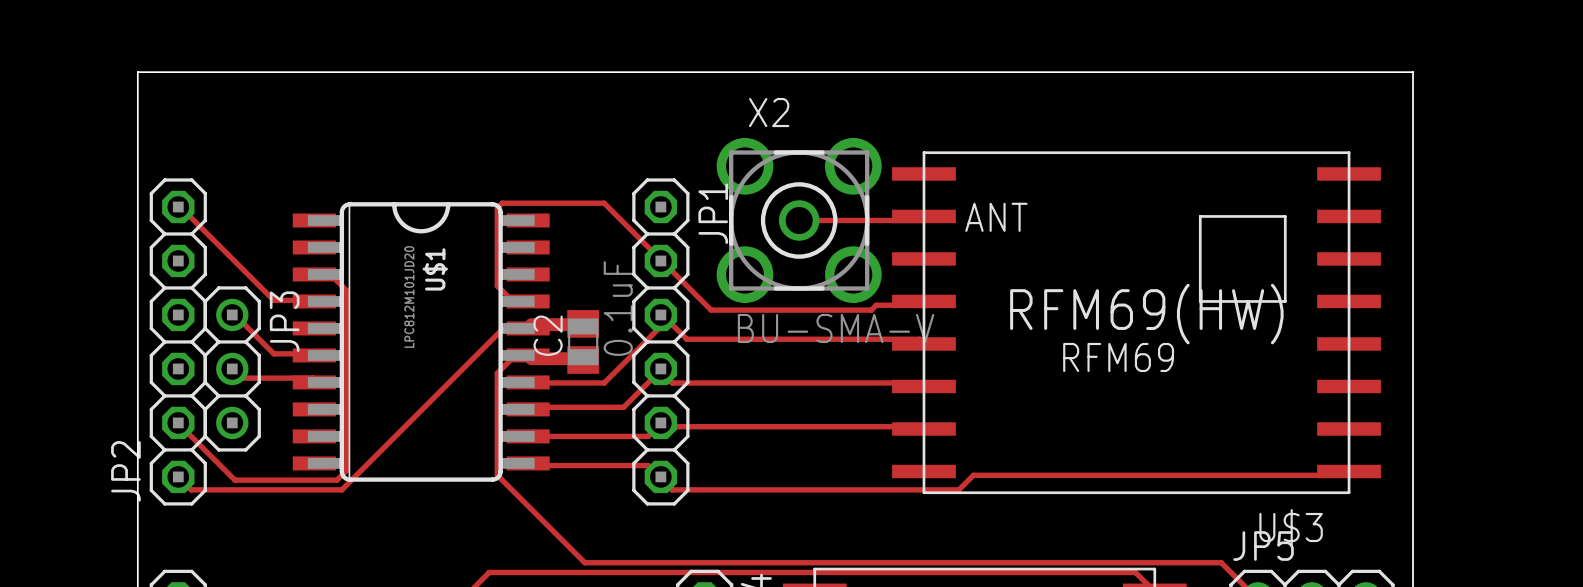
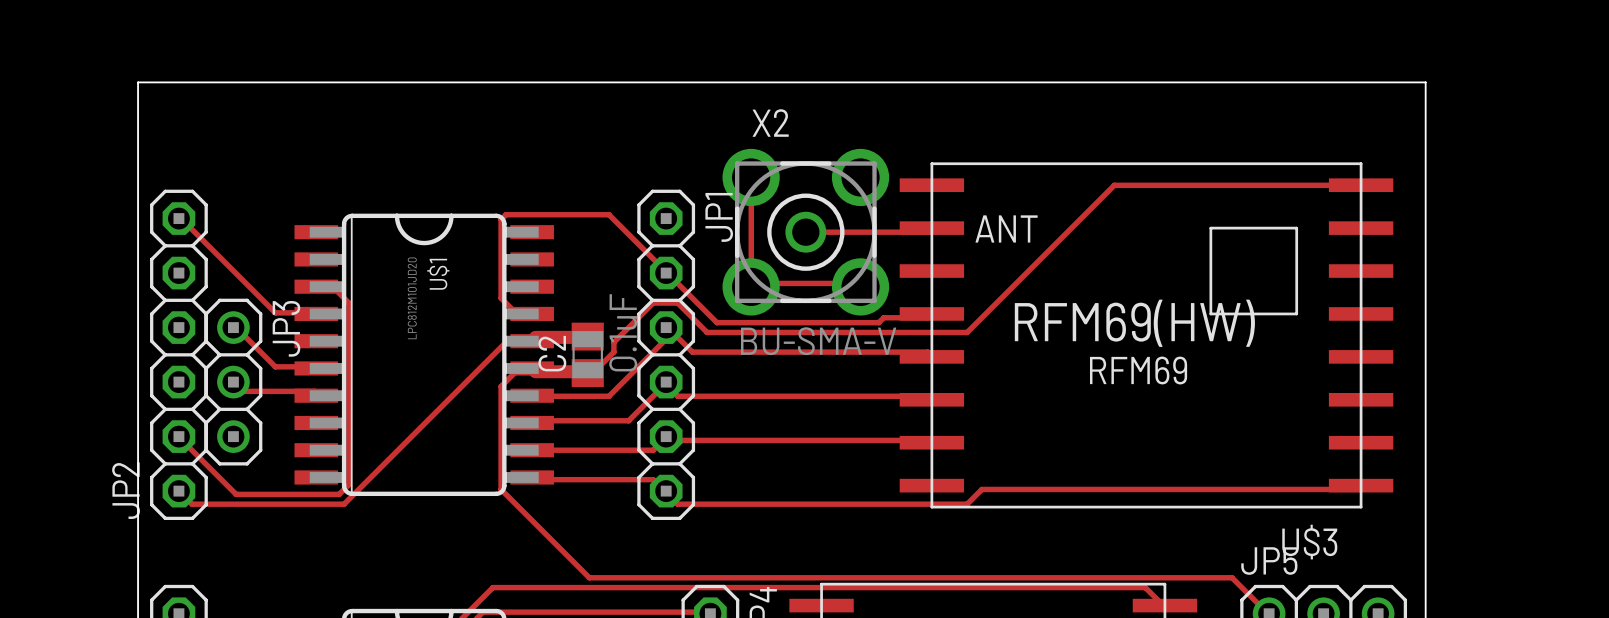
track: none -> (751, 177) (751, 283)
track: none -> (1361, 185) (1114, 185) (967, 332) (707, 332) (677, 303) (653, 303) (613, 342) (613, 352) (589, 376) (587, 373)
track: none -> (751, 283) (859, 283) (860, 286)

